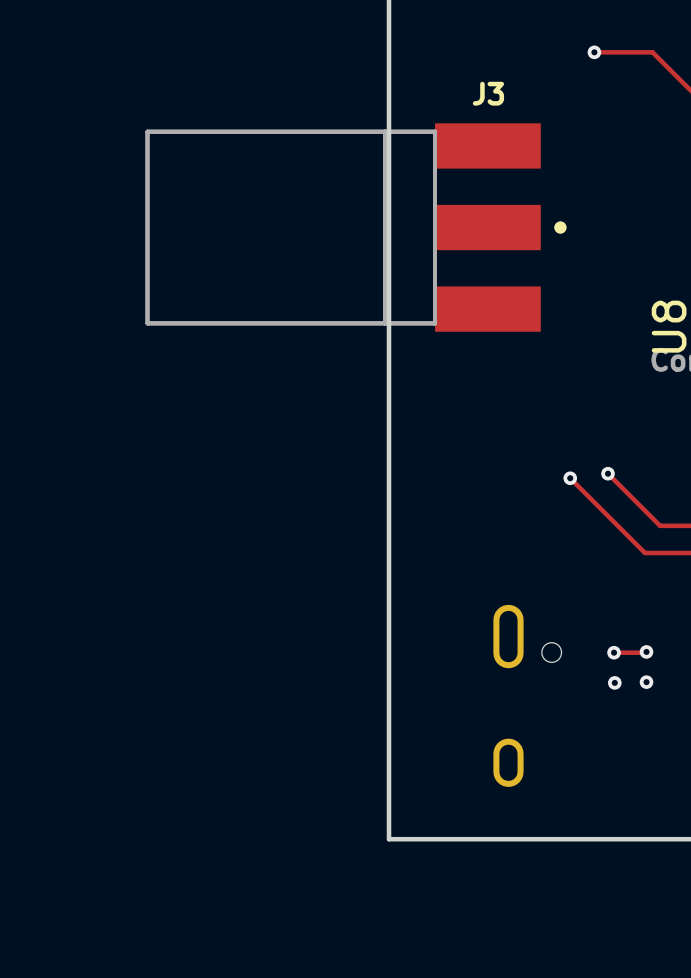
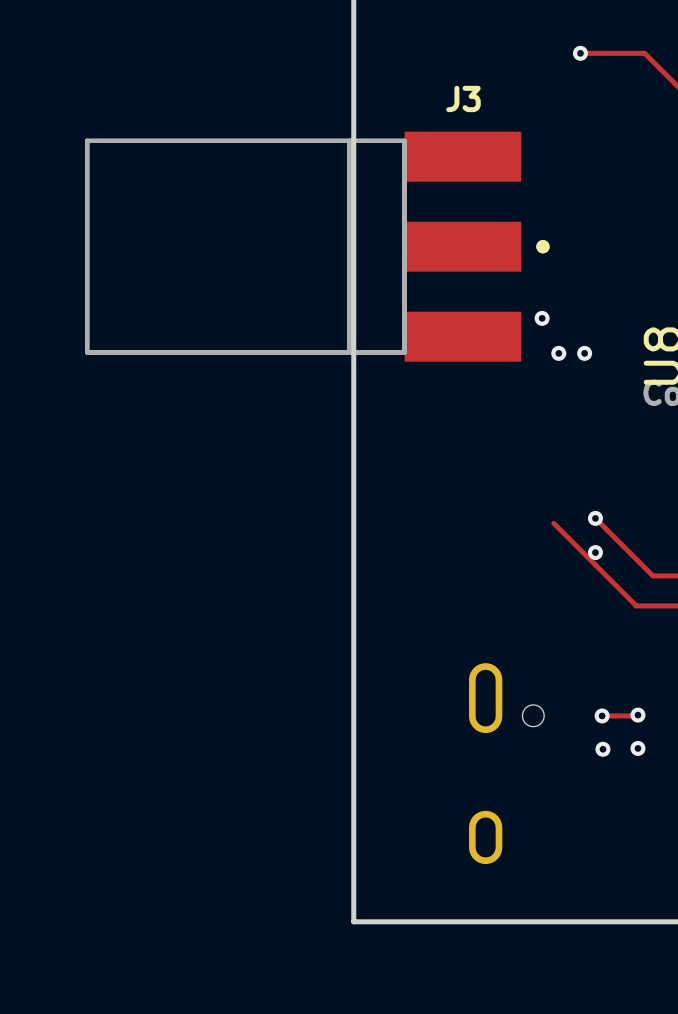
via: none -> (542, 318)
via: none -> (558, 353)
via: none -> (584, 353)
via position: (570, 478) -> (595, 552)

